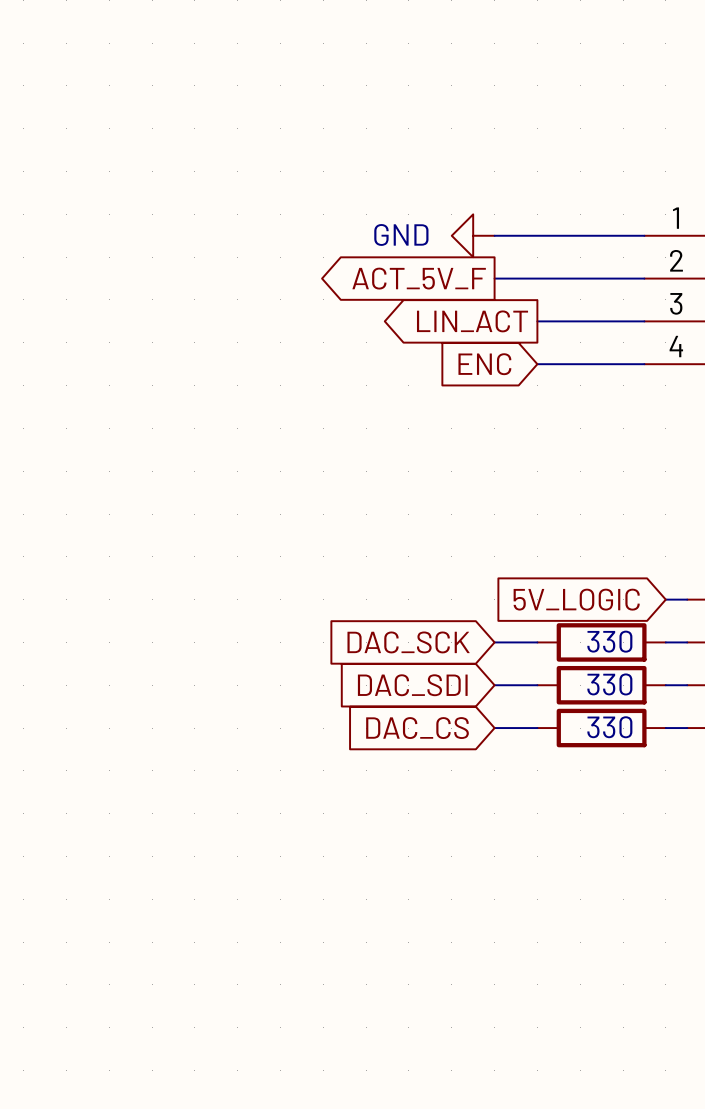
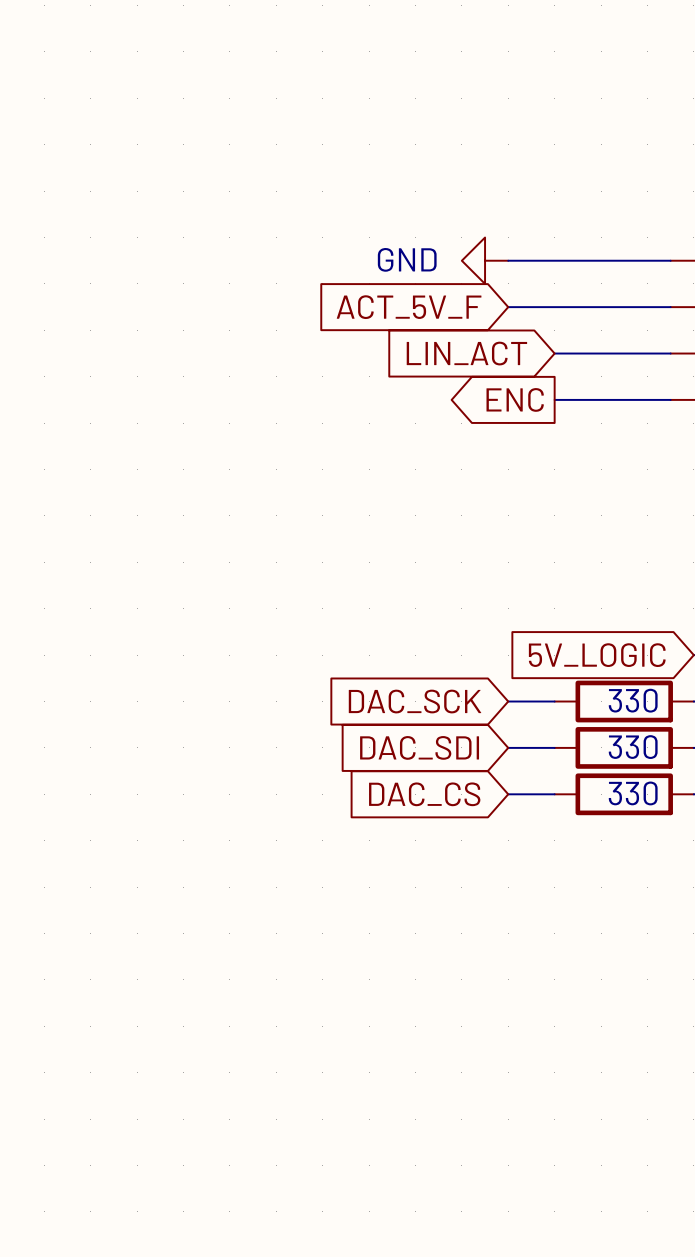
global label shape: output (419, 278) -> input (409, 307)
global label shape: output (472, 321) -> input (466, 353)
global label shape: input (484, 364) -> output (515, 399)

